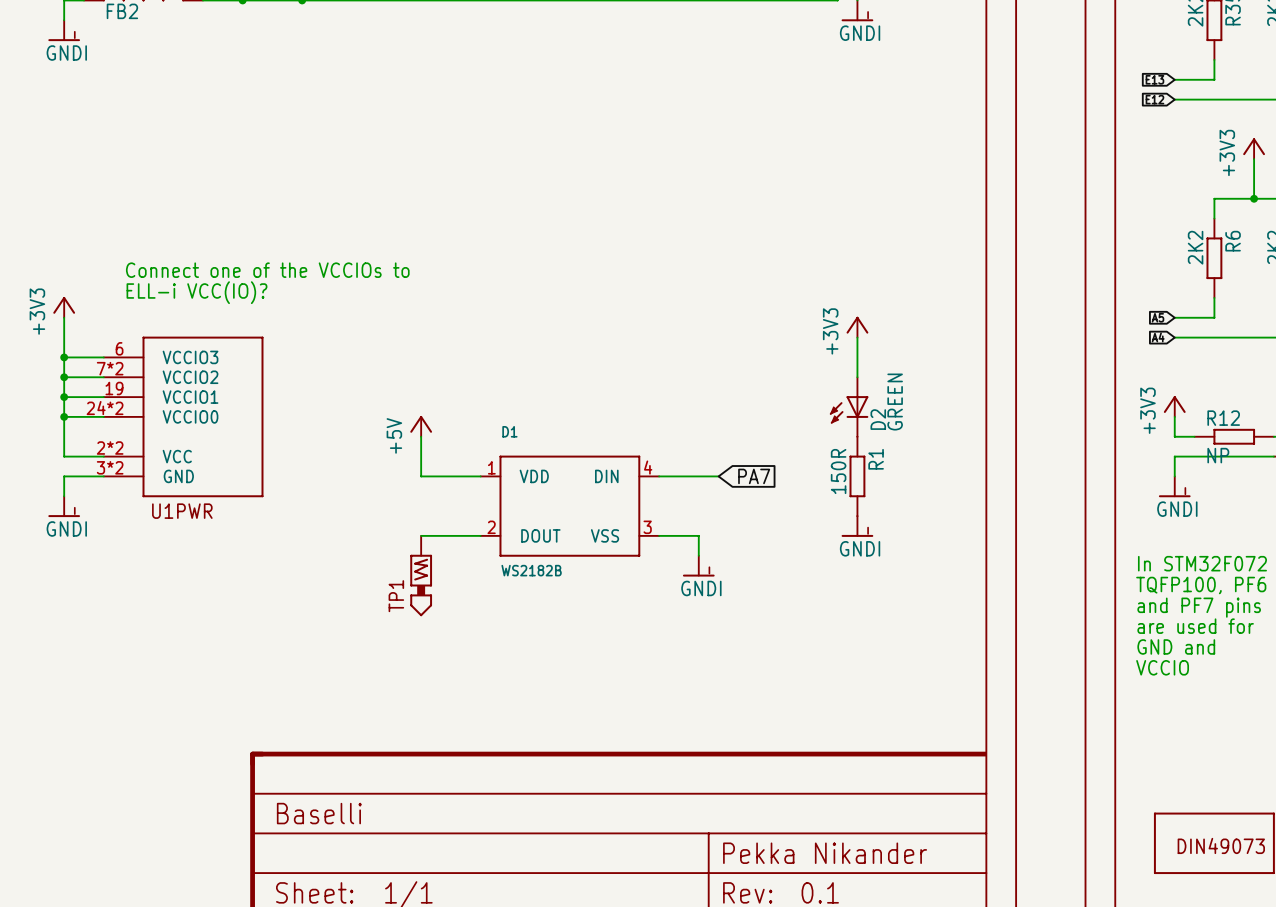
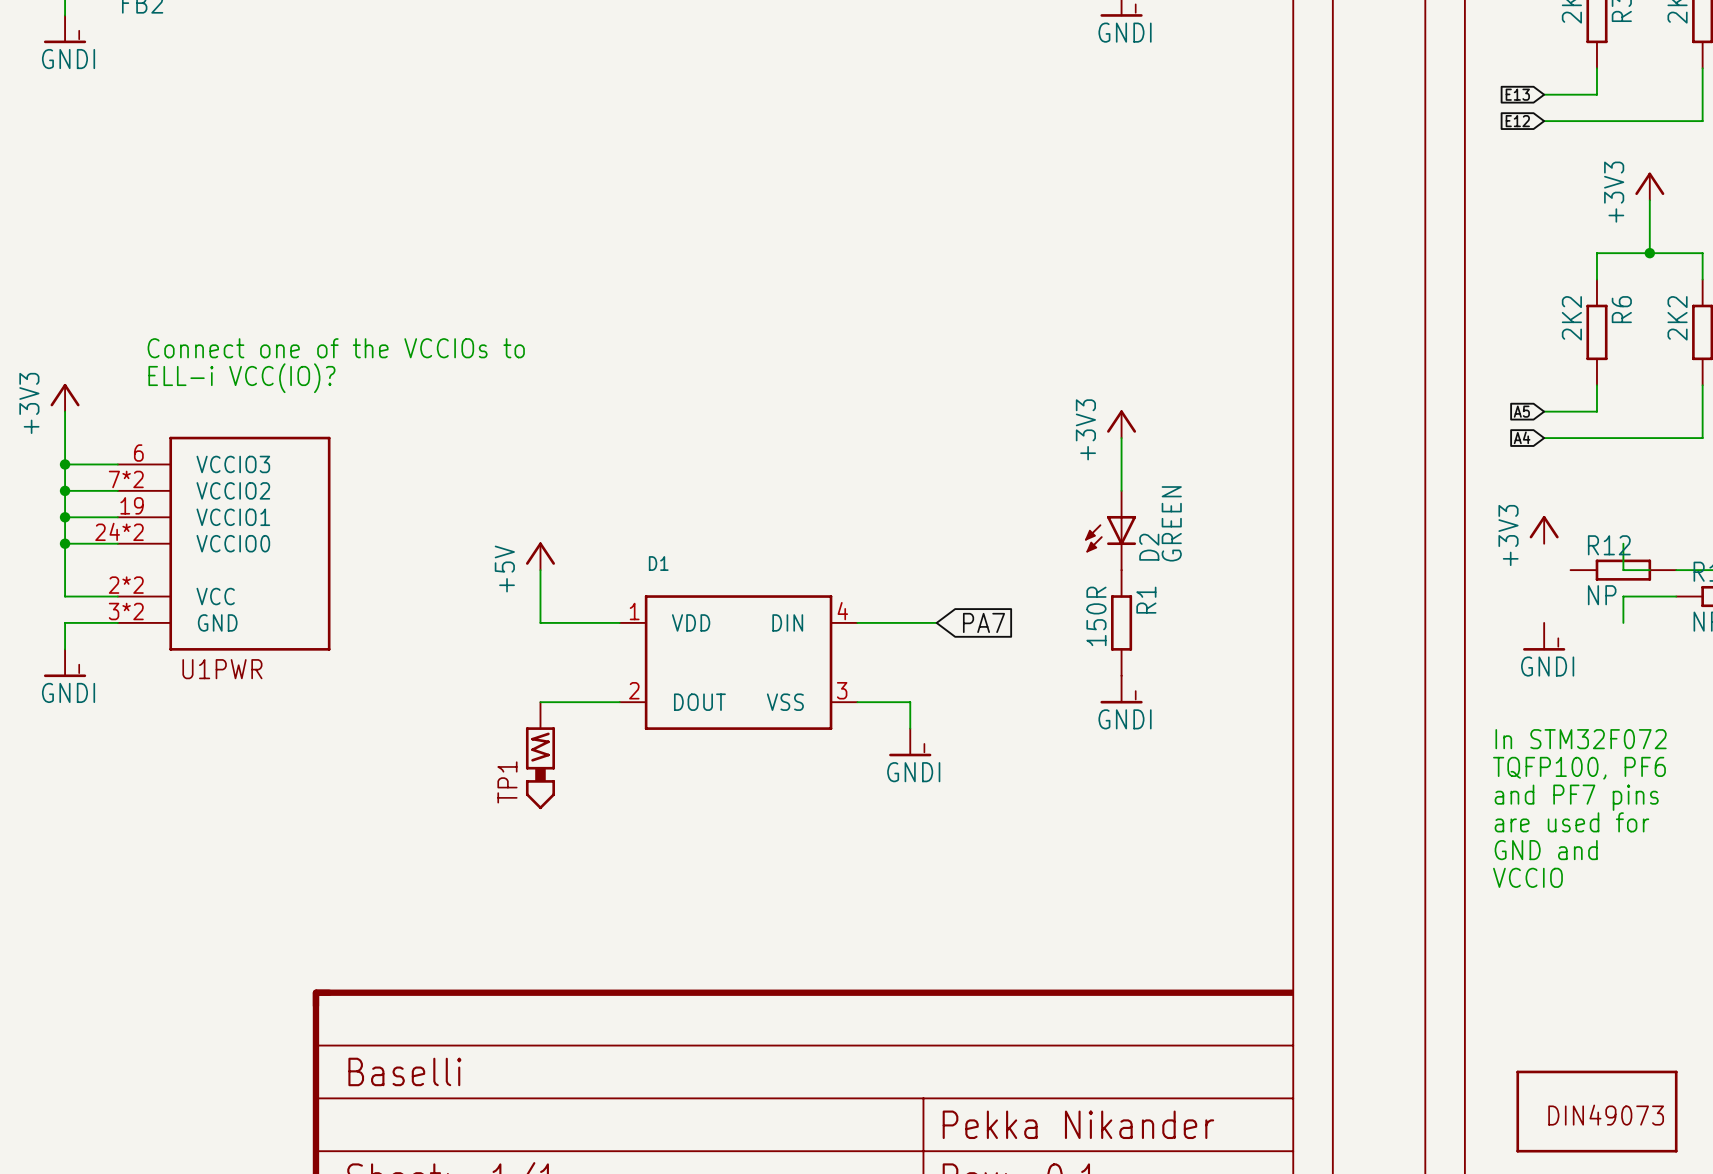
wire: (1174, 416) (1174, 436) (1194, 436) -> (1623, 543) (1623, 570) (1649, 570)
wire: (1234, 456) (1174, 456) (1174, 476) -> (1623, 596) (1623, 622)
D1 value: WS2182B (531, 570) -> none

